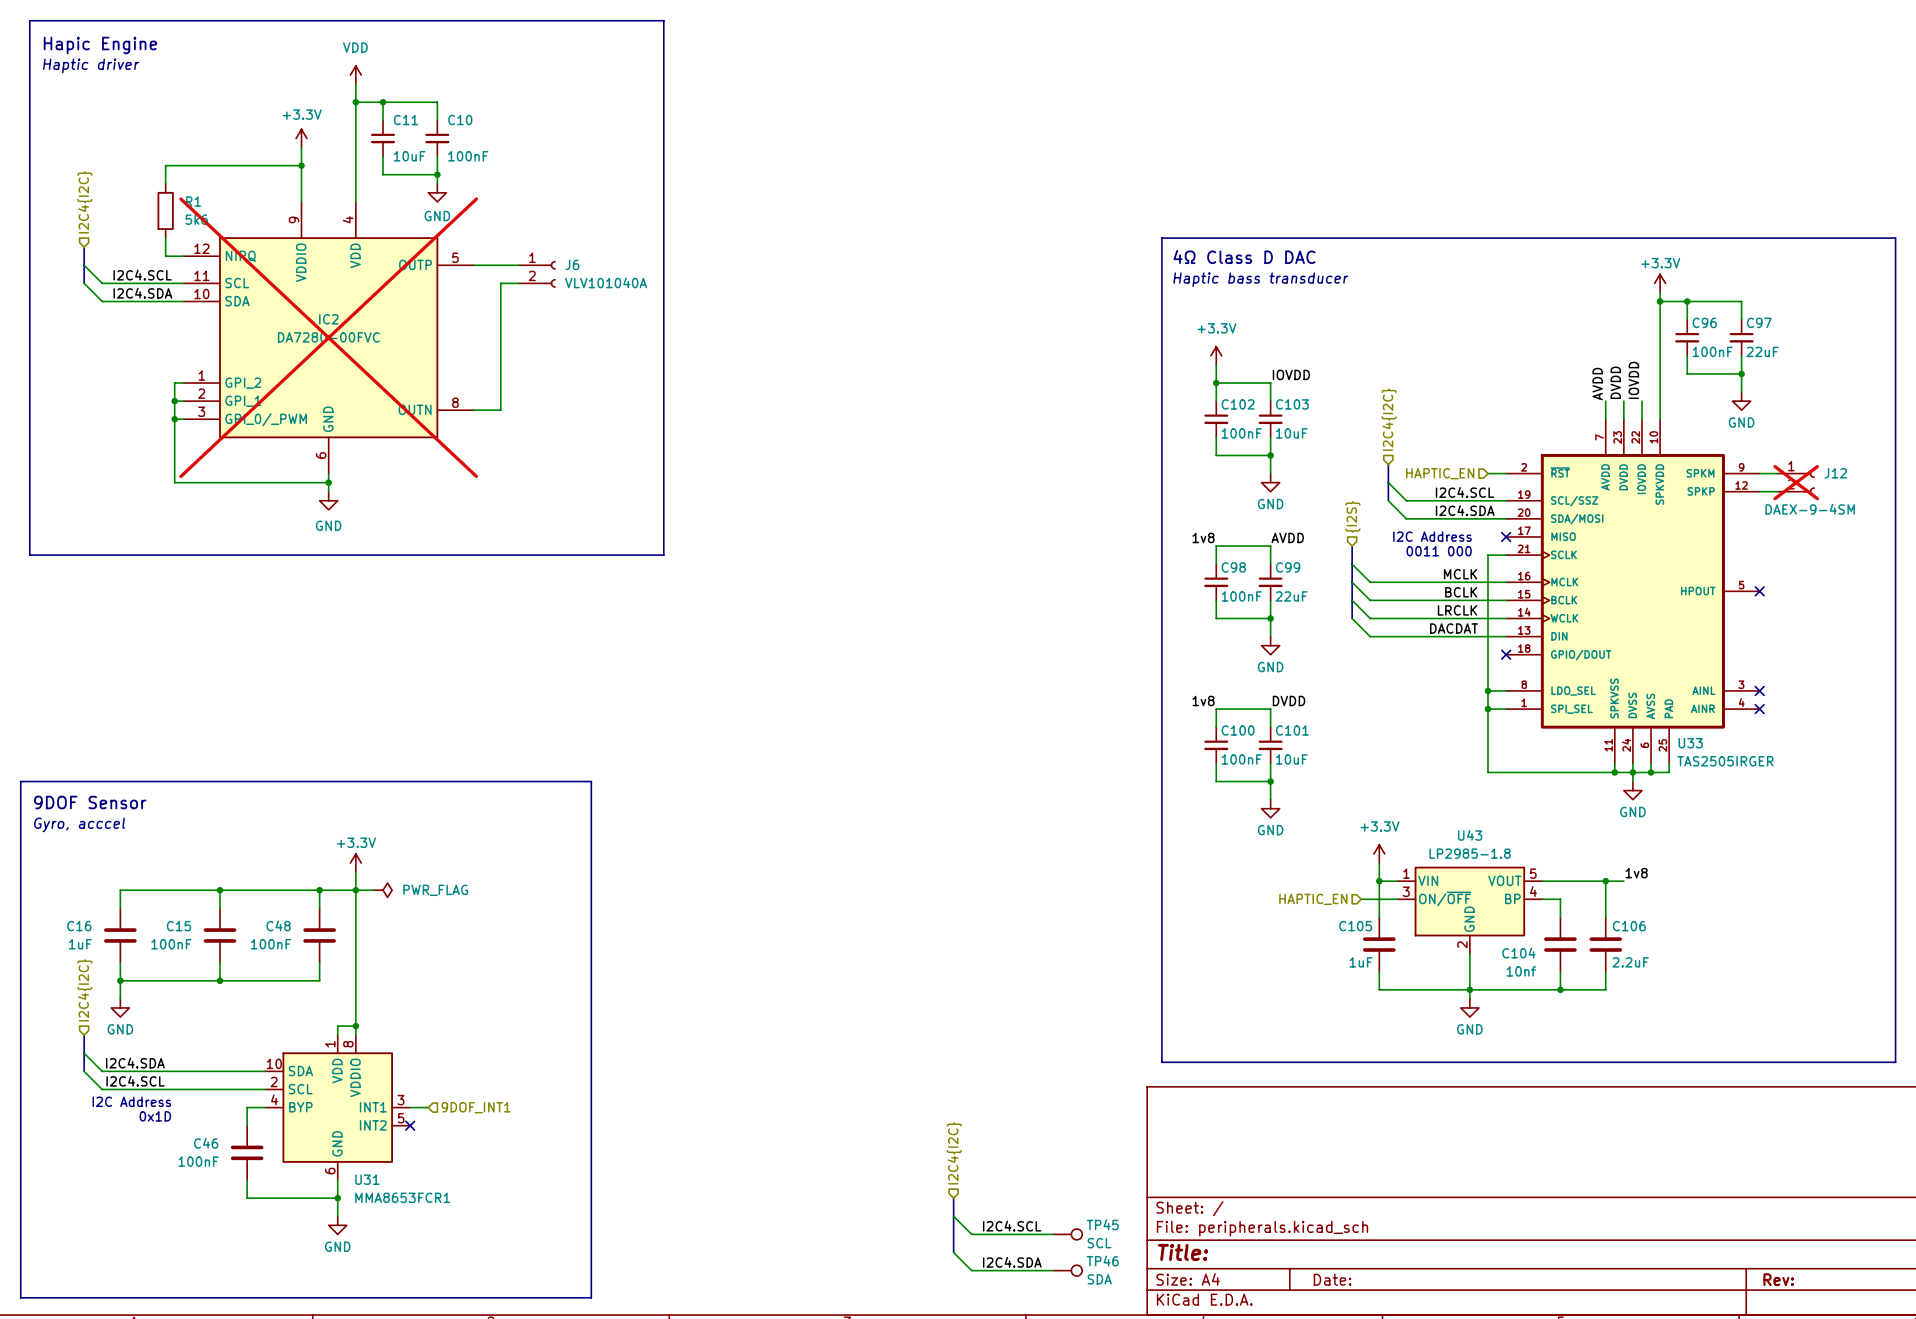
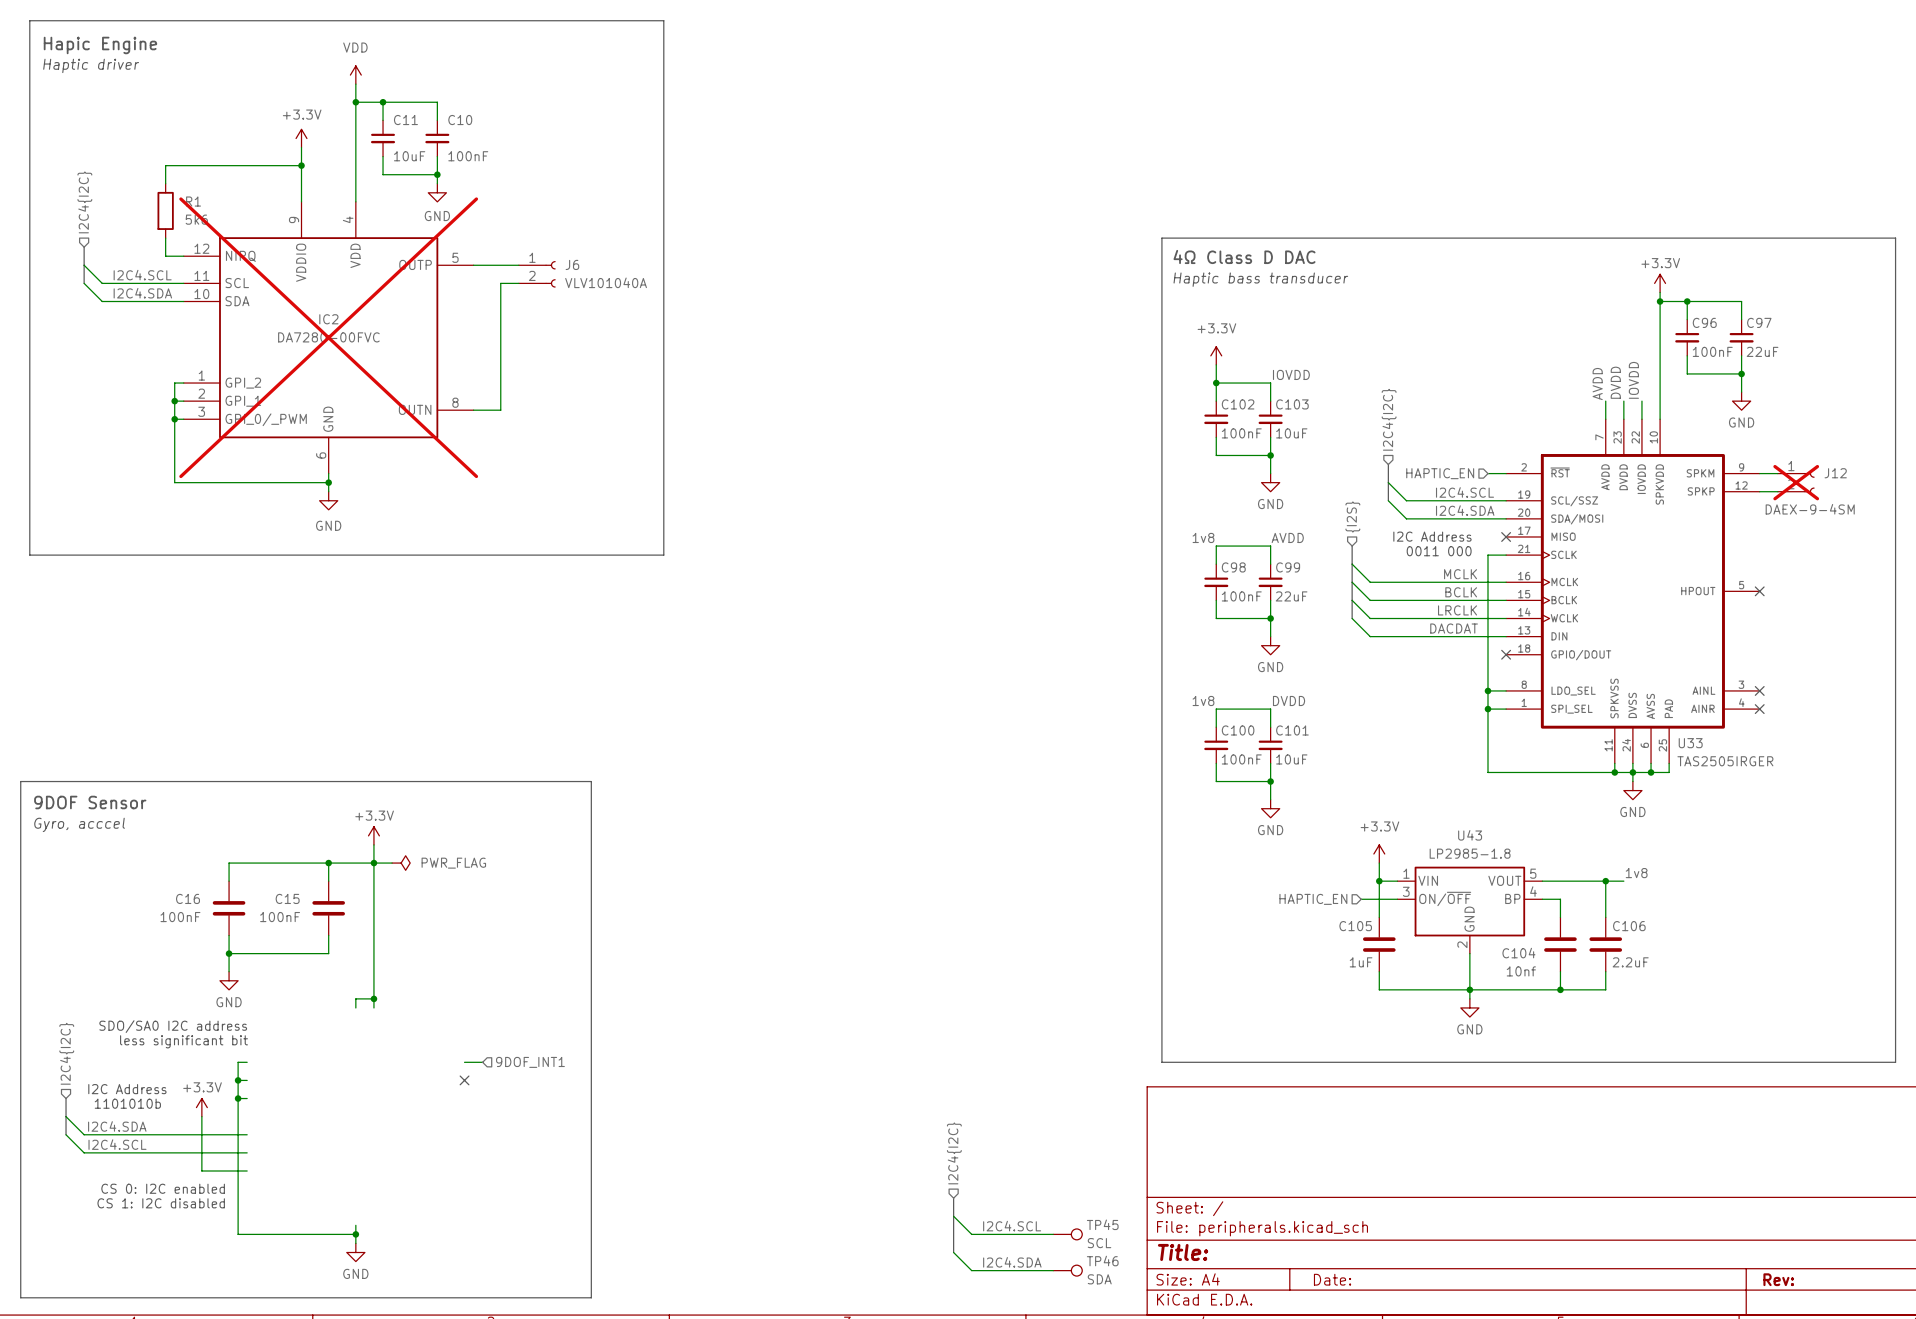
wire: none -> (373, 844) (373, 1007)
junction: none -> (328, 863)
power symbol position: +3.3V (355, 863) -> +3.3V (373, 835)
junction: none -> (373, 863)
wire: none -> (392, 863) (229, 863) (229, 881)
wire: (355, 872) (355, 998) -> (373, 998) (355, 998)
wire: (219, 890) (219, 908) -> (328, 863) (328, 881)
junction: (219, 890) -> none
wire: (319, 890) (319, 908) -> none
junction: (319, 890) -> none
junction: (355, 890) -> none
wire: (373, 890) (120, 890) (120, 908) -> none
power symbol position: PWR_FLAG (383, 890) -> PWR_FLAG (401, 863)
C16 position: (120, 935) -> (229, 908)
C15 position: (219, 935) -> (328, 908)
C48: 100nF (319, 935) -> none
wire: none -> (328, 935) (328, 953) (229, 953)
C16 value: 1uF (80, 944) -> 100nF (180, 917)
wire: (120, 962) (120, 998) -> (229, 935) (229, 971)
wire: (219, 962) (219, 980) -> none
wire: (319, 962) (319, 980) (120, 980) -> none
junction: (120, 980) -> none
junction position: (219, 980) -> (229, 953)
hierarchical label position: I2C4{I2C} (84, 990) -> I2C4{I2C} (66, 1053)
power symbol position: GND (120, 1007) -> GND (229, 980)
wire: (355, 1007) (355, 1035) -> none
text: none -> SDO/SA0 I2C address (173, 1026)
wire: (355, 1026) (337, 1026) (337, 1035) -> none
junction position: (355, 1026) -> (373, 998)
bus: (84, 1035) (84, 1071) -> (66, 1098) (66, 1134)
text: none -> less significant bit (183, 1041)
wire: (84, 1053) (102, 1071) (265, 1071) -> (66, 1116) (84, 1134) (247, 1134)
wire: none -> (247, 1062) (238, 1062) (238, 1234) (355, 1234)
label position: I2C4.SDA (135, 1063) -> I2C4.SDA (117, 1126)
wire: (84, 1071) (102, 1089) (265, 1089) -> (66, 1134) (84, 1152) (247, 1152)
wire: none -> (238, 1080) (247, 1080)
junction: none -> (238, 1080)
no-connect mark: none -> (464, 1080)
label position: I2C4.SCL (135, 1081) -> I2C4.SCL (117, 1144)
wire: none -> (238, 1098) (247, 1098)
junction: none -> (238, 1098)
text position: I2C Address (131, 1101) -> I2C Address (127, 1089)
text: none -> 1101010b (127, 1103)
power symbol: none -> +3.3V (201, 1107)
wire: (265, 1107) (247, 1107) (247, 1125) -> none
U31: MMA8653FCR1 (337, 1107) -> none
wire: (410, 1107) (428, 1107) -> (464, 1062) (482, 1062)
hierarchical label position: 9DOF_INT1 (476, 1107) -> 9DOF_INT1 (530, 1062)
text: 0x1D (155, 1116) -> none
wire: none -> (201, 1116) (201, 1170) (247, 1170)
no-connect mark: (410, 1125) -> none
C46: 100nF (247, 1152) -> none
wire: (247, 1180) (247, 1198) (337, 1198) -> none
wire: (337, 1180) (337, 1216) -> none
text: none -> CS 0: I2C enabled (163, 1188)
junction position: (337, 1198) -> (355, 1234)
text: none -> CS 1: I2C disabled (161, 1203)
power symbol position: GND (337, 1225) -> GND (355, 1252)
wire: none -> (355, 1225) (355, 1243)

